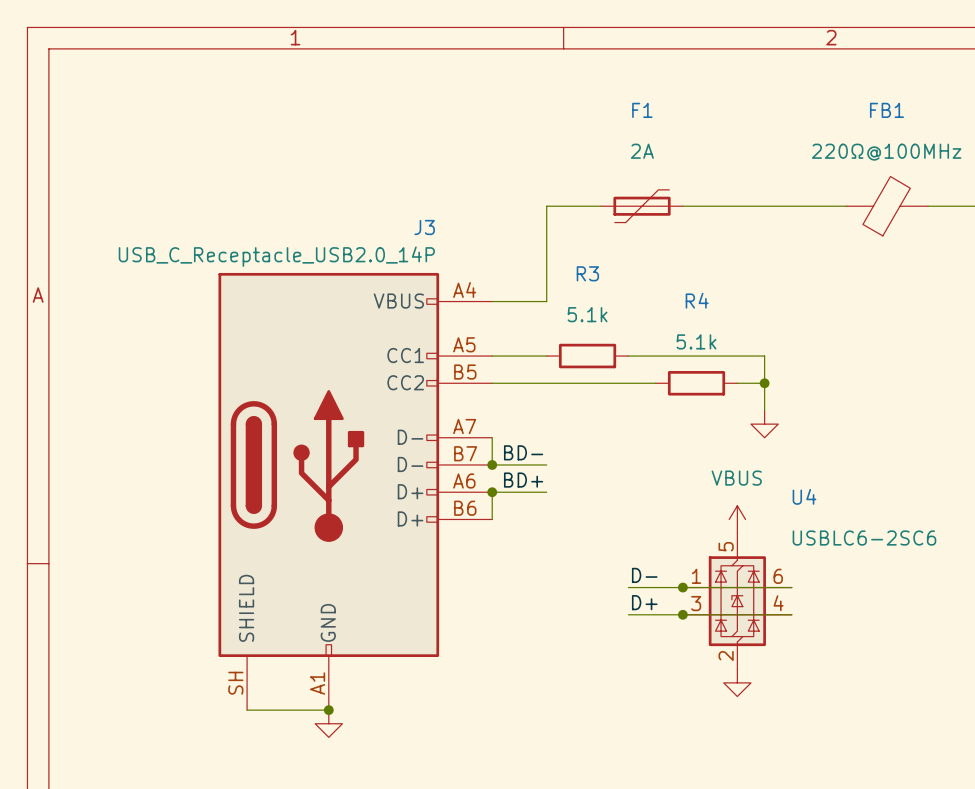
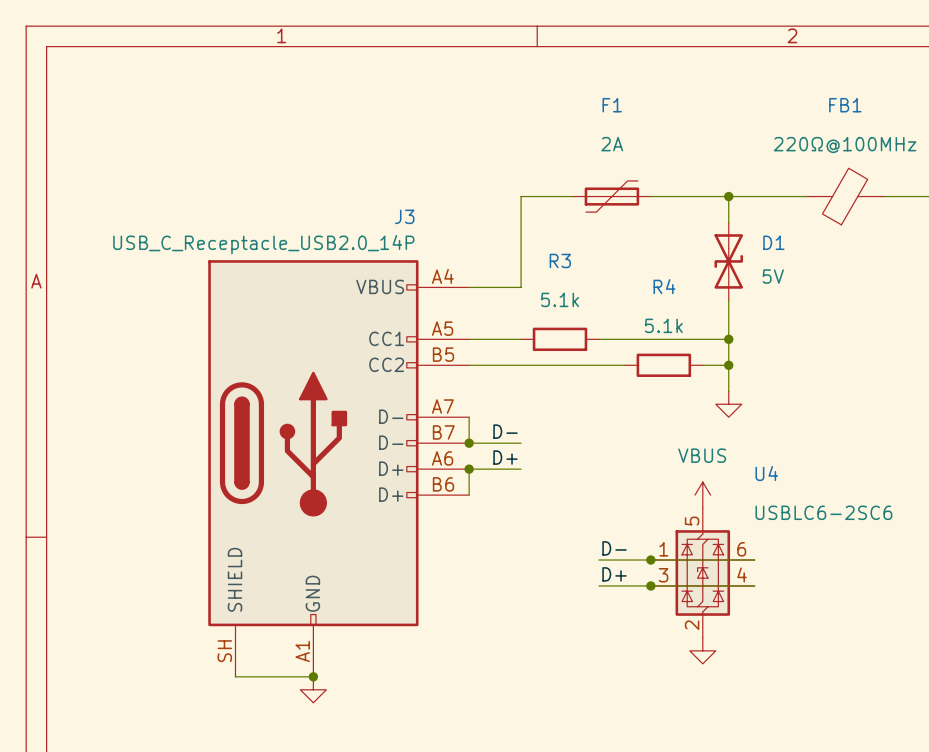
wire: none -> (728, 196) (728, 222)
junction: none -> (728, 196)
D1: none -> 5V (728, 261)
wire: none -> (728, 300) (728, 339)
junction: none -> (728, 339)
label: BD- (523, 452) -> D- (505, 431)
label: BD+ (523, 480) -> D+ (505, 457)

